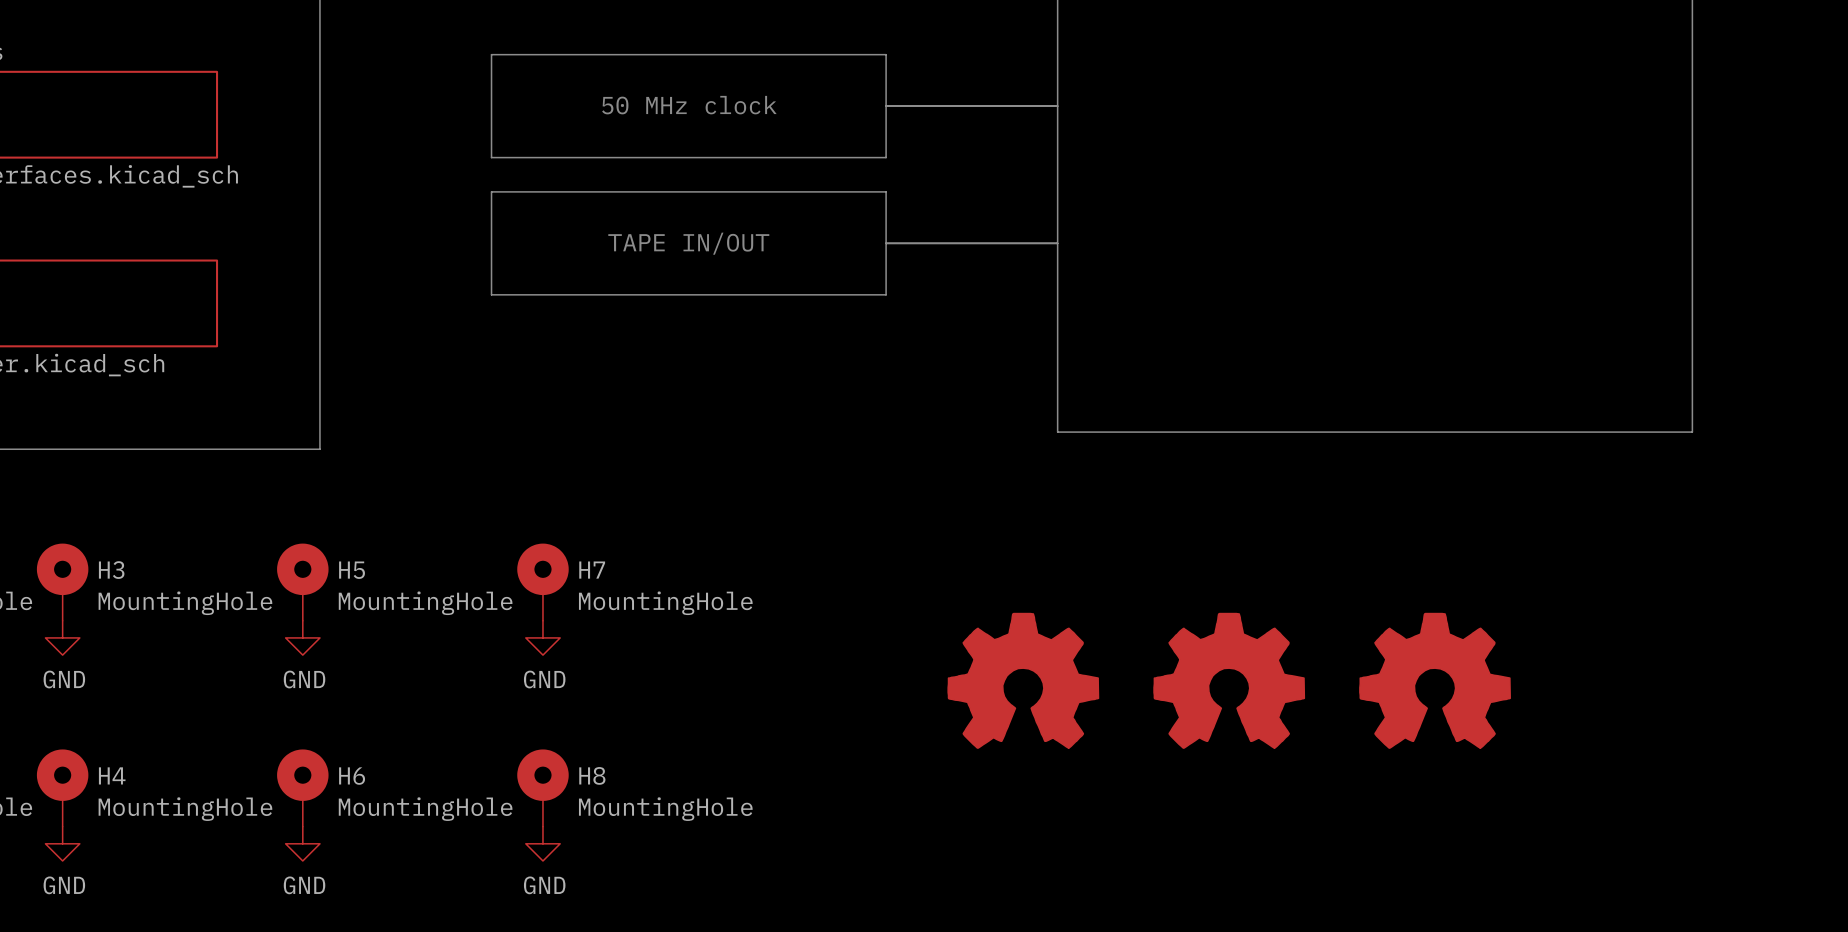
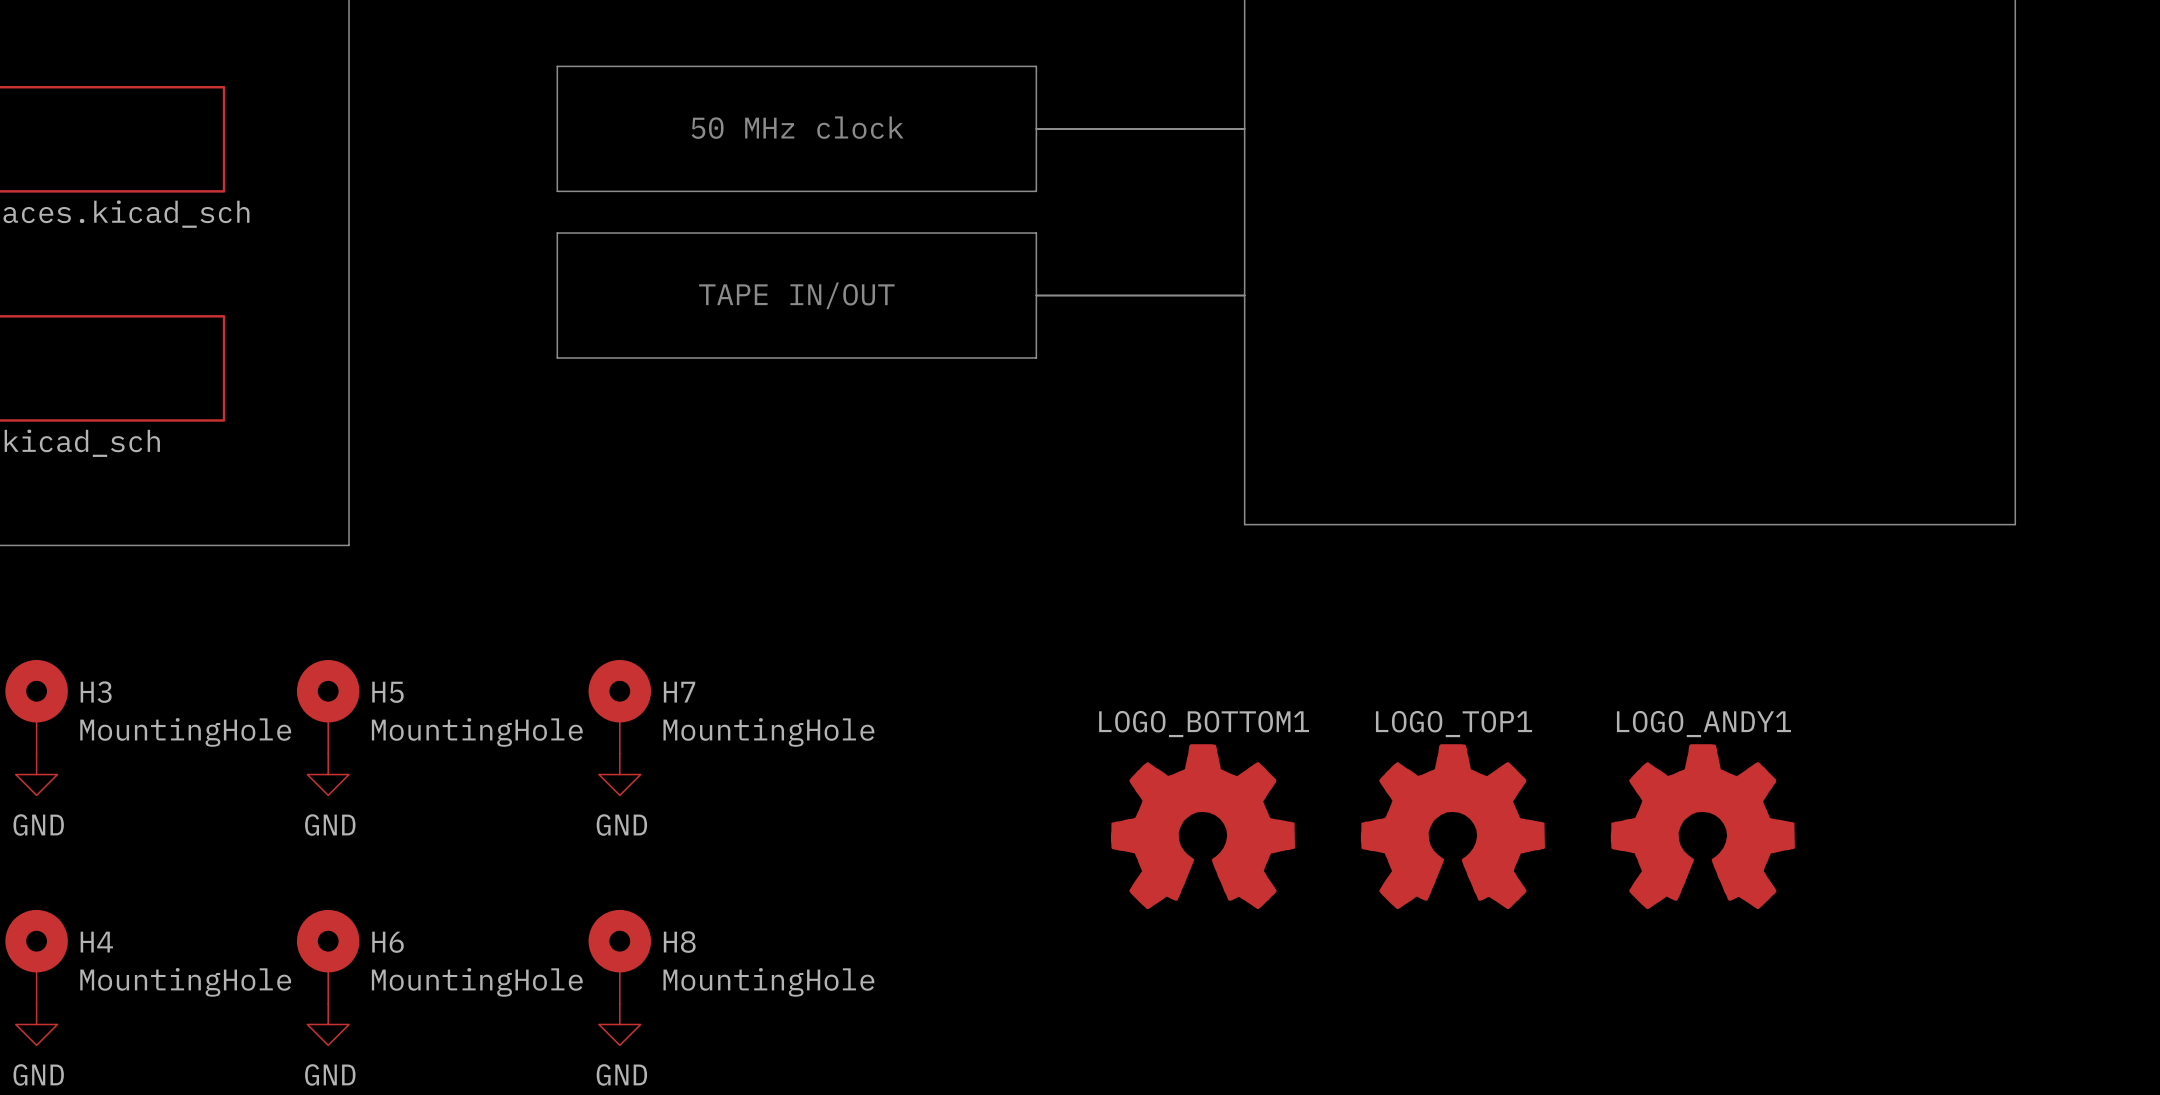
LOGO_BOTTOM1 name: none -> LOGO_BOTTOM1 (1204, 724)
LOGO_TOP1 name: none -> LOGO_TOP1 (1454, 724)
LOGO_ANDY1 name: none -> LOGO_ANDY1 (1703, 724)

